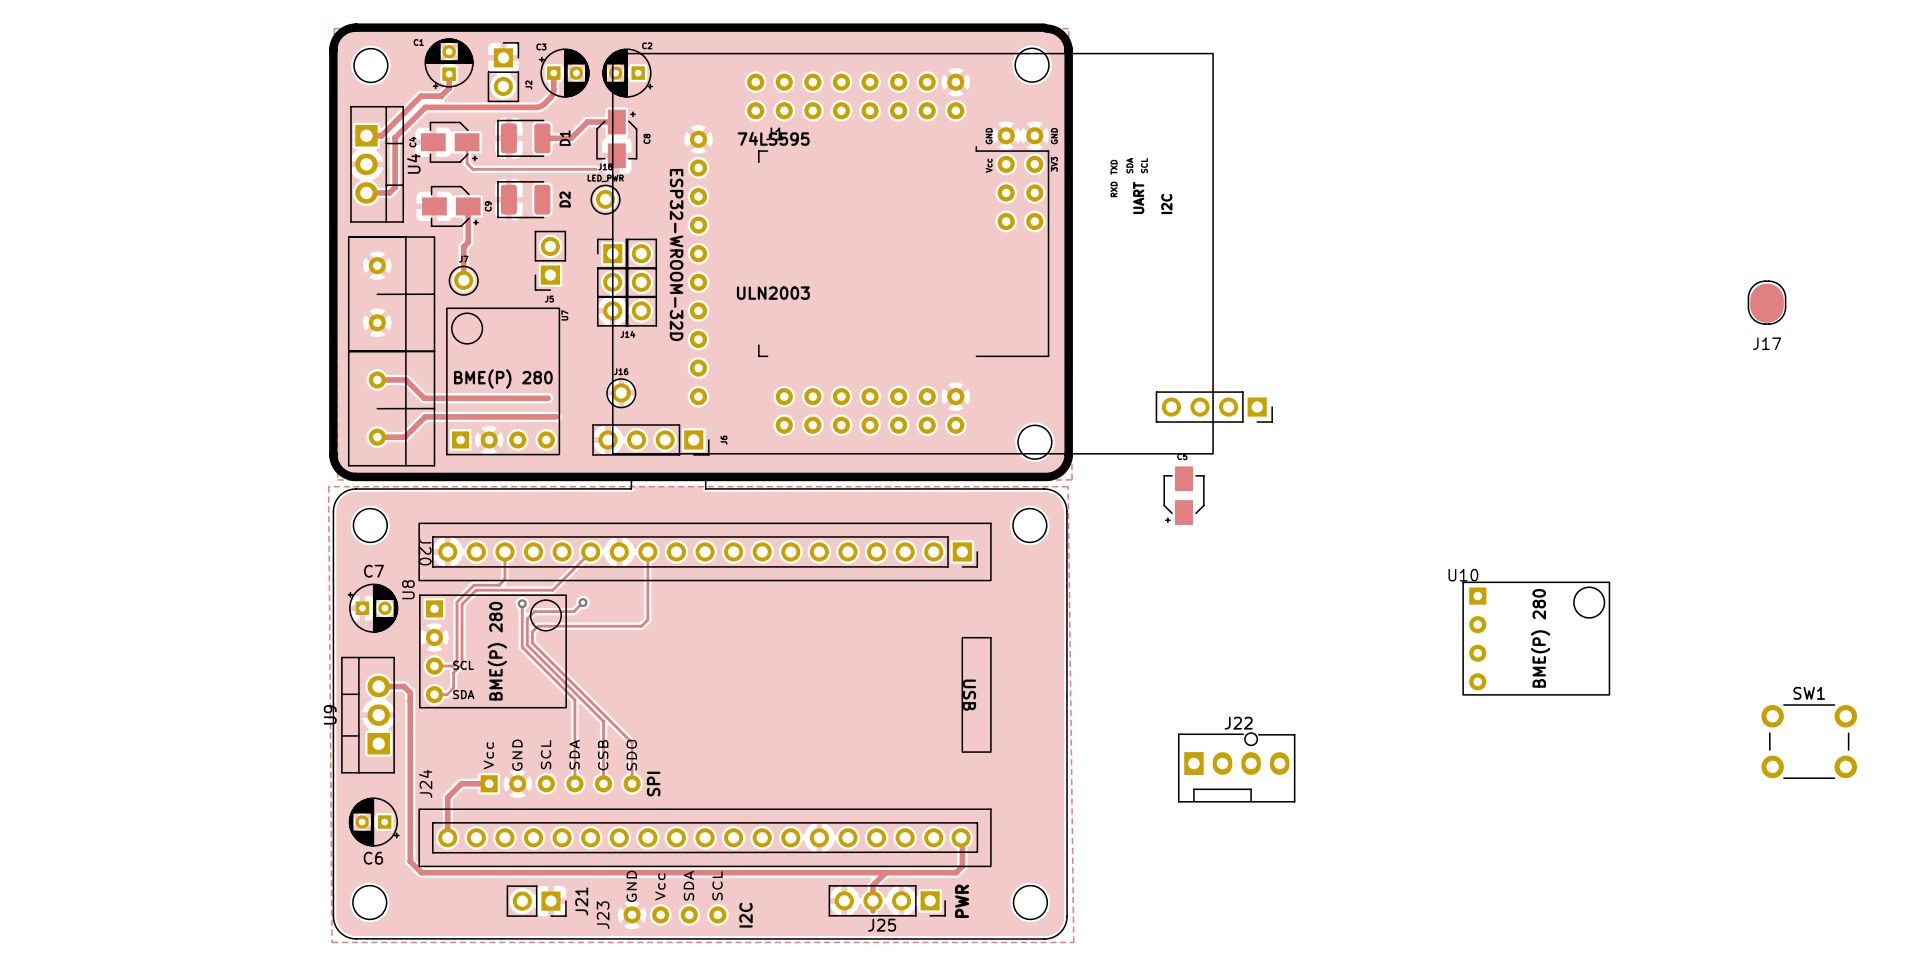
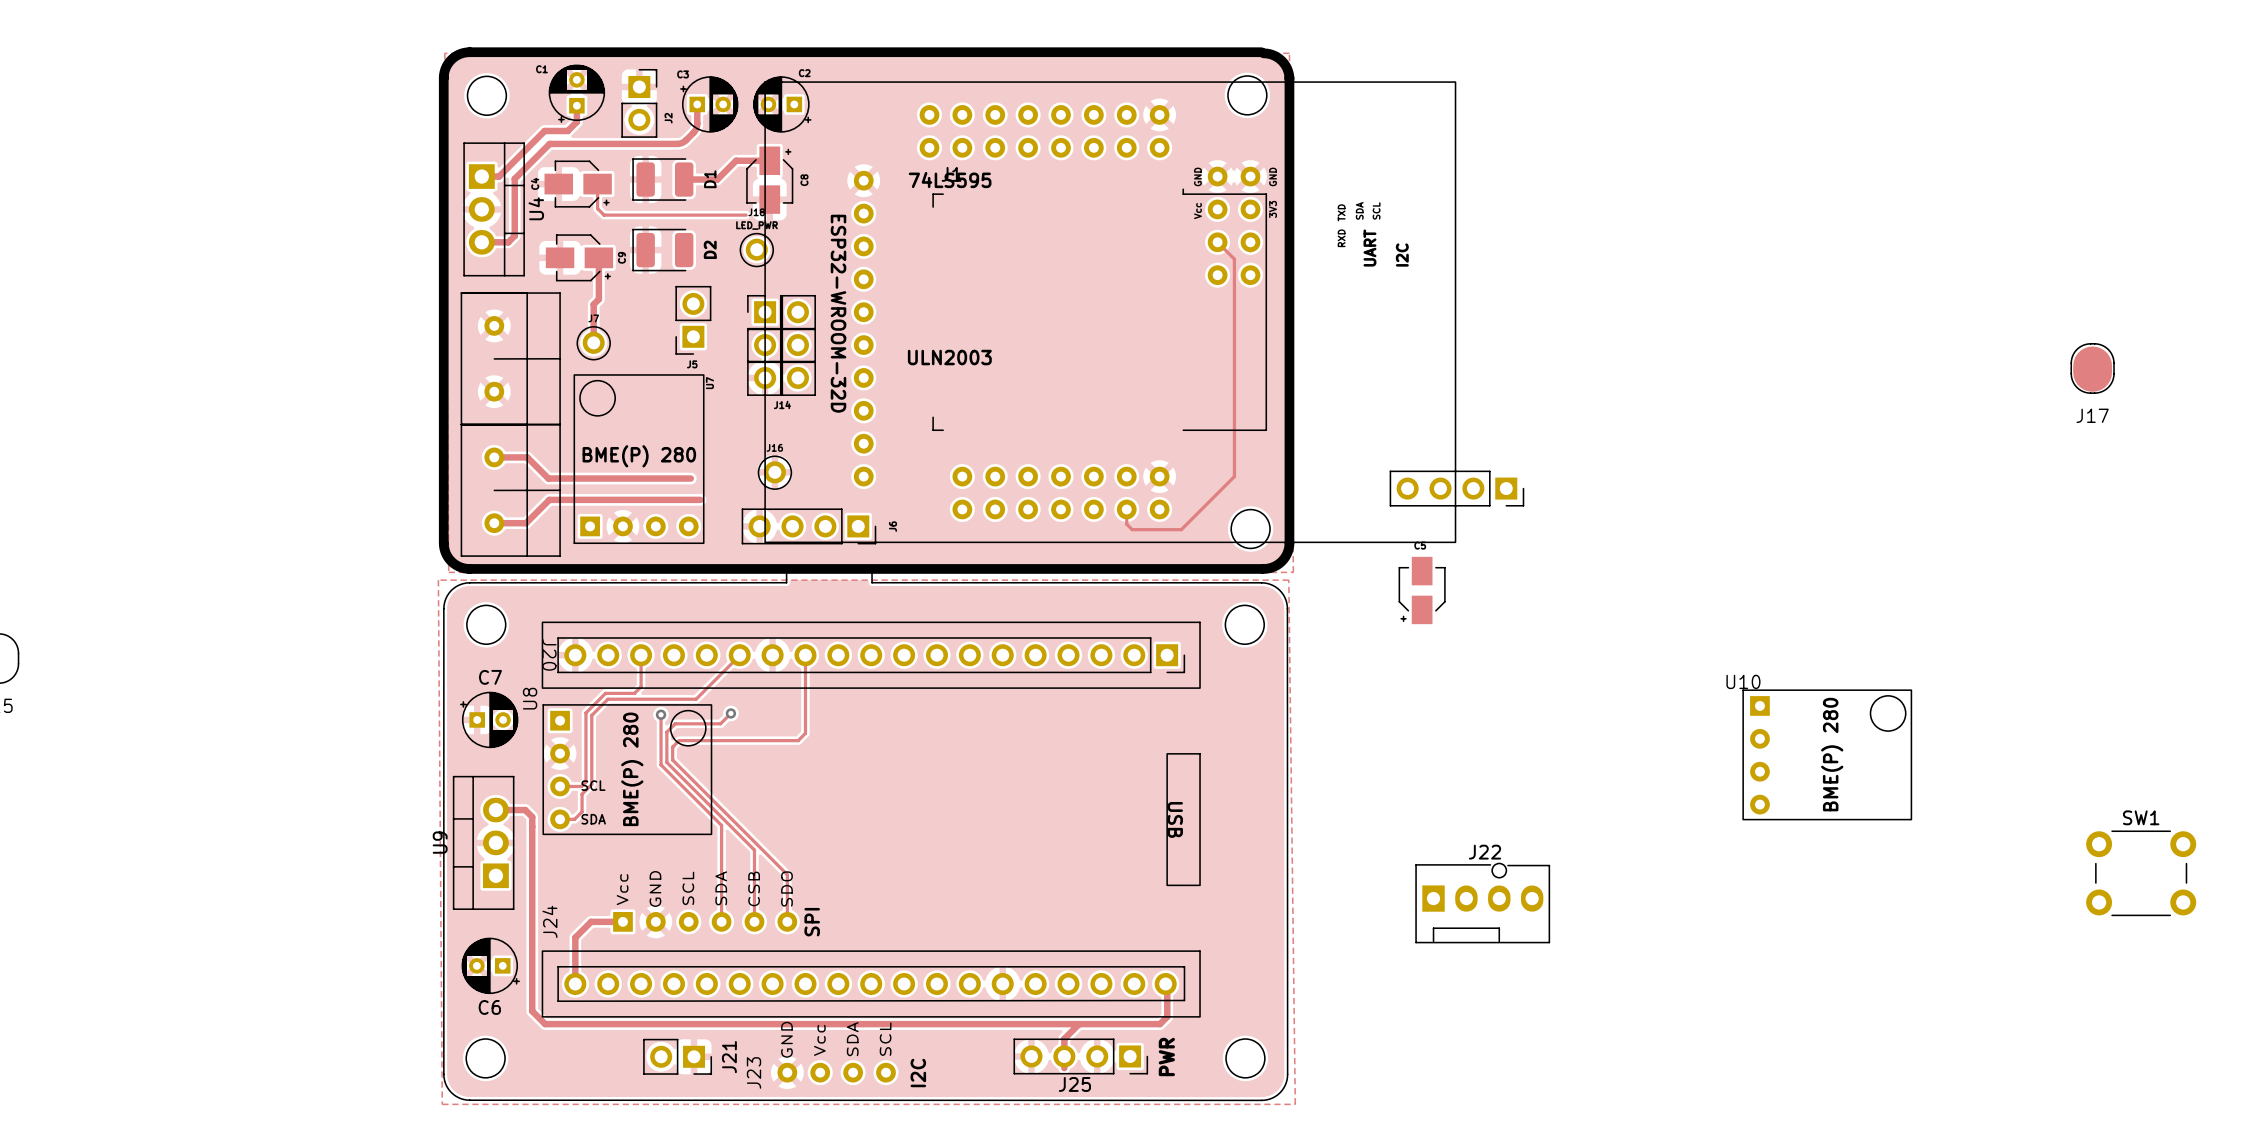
track: none -> (1217, 242) (1234, 259) (1234, 476) (1181, 529) (1132, 529) (1126, 524) (1126, 509)

